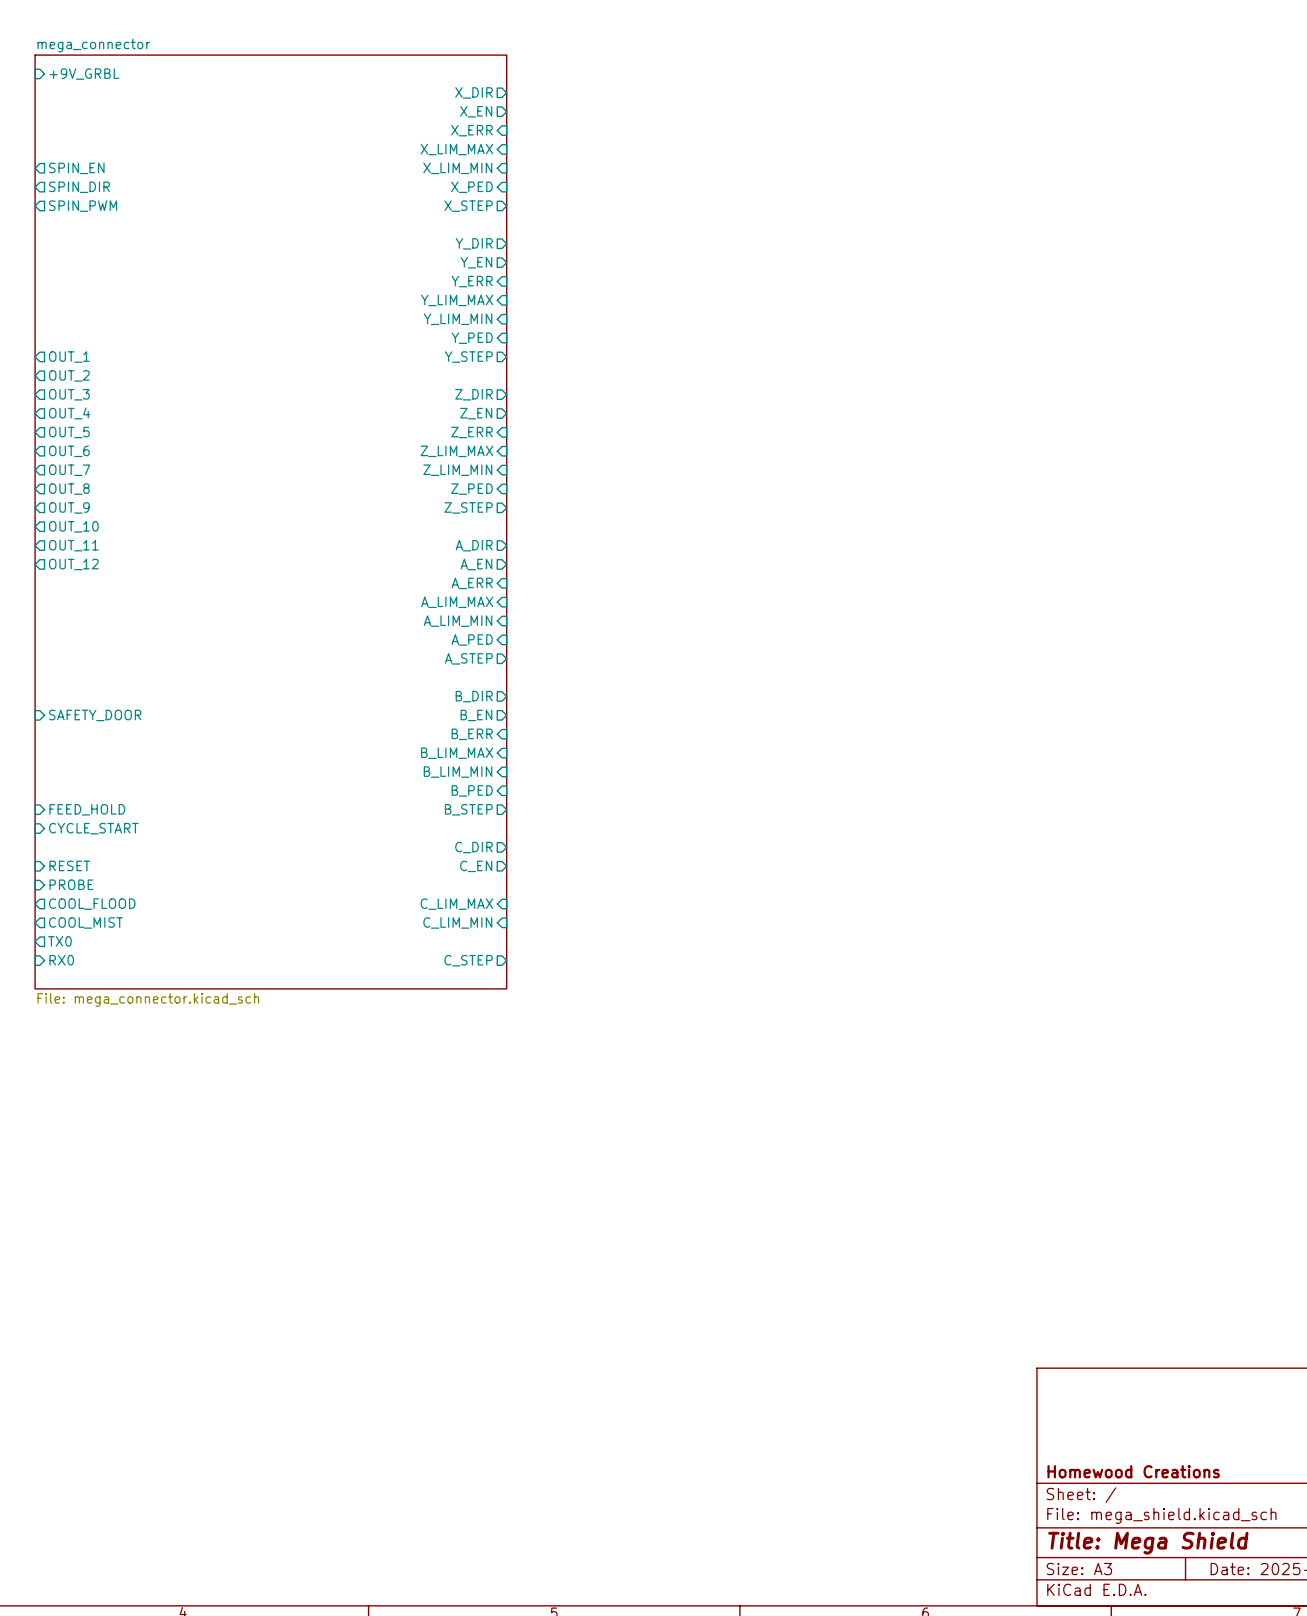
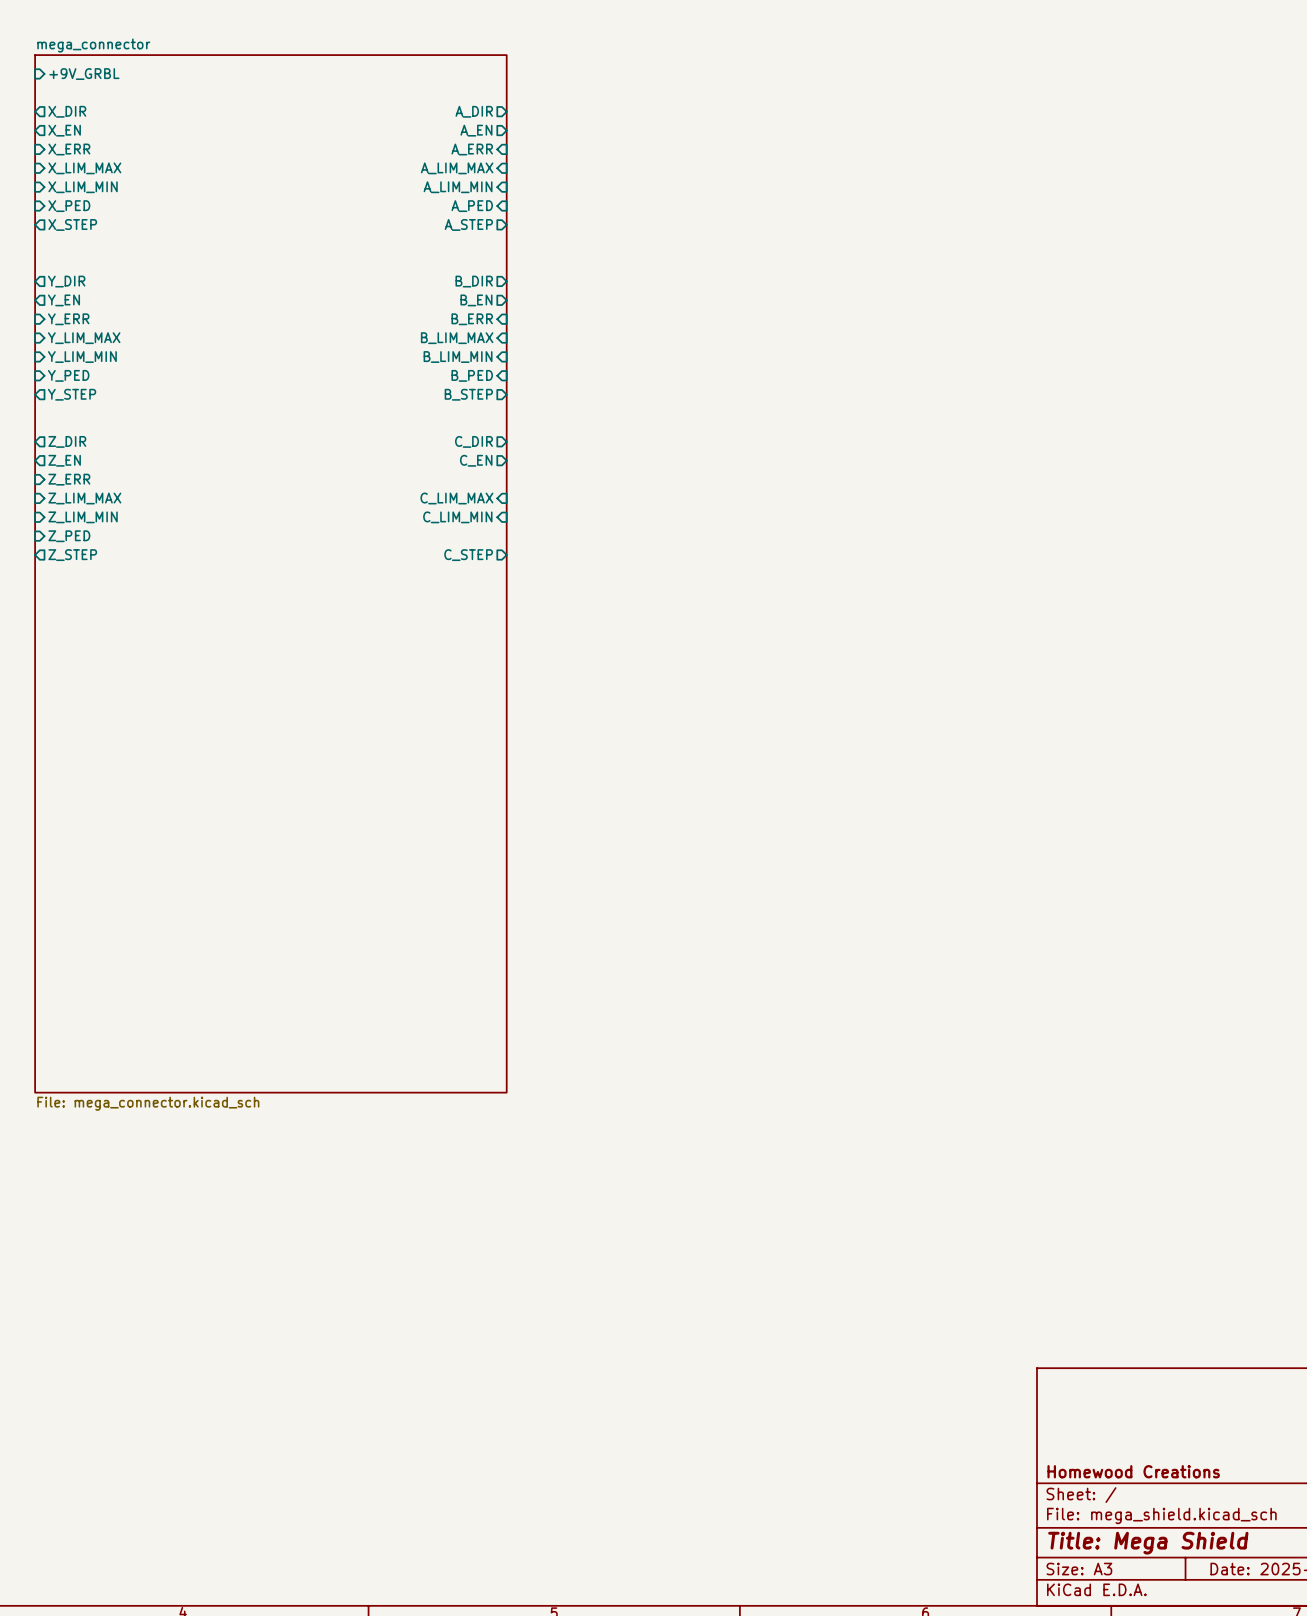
sheet pin: X_DIR (473, 92) -> none
sheet pin: none -> X_DIR (67, 111)
sheet pin: X_EN (476, 111) -> A_DIR (474, 111)
sheet pin: none -> X_EN (64, 130)
sheet pin shape: input (471, 130) -> output (476, 130)
sheet pin: X_ERR (471, 130) -> A_EN (476, 130)
sheet pin: none -> X_ERR (69, 149)
sheet pin: X_LIM_MAX (456, 149) -> A_ERR (472, 149)
sheet pin shape: output (76, 168) -> input (84, 168)
sheet pin: SPIN_EN (76, 168) -> X_LIM_MAX (84, 168)
sheet pin: X_LIM_MIN (457, 168) -> A_LIM_MAX (457, 168)
sheet pin shape: output (79, 187) -> input (83, 187)
sheet pin: SPIN_DIR (79, 187) -> X_LIM_MIN (83, 187)
sheet pin: X_PED (471, 187) -> A_LIM_MIN (458, 187)
sheet pin shape: output (83, 206) -> input (69, 206)
sheet pin: SPIN_PWM (83, 206) -> X_PED (69, 206)
sheet pin shape: output (468, 206) -> input (472, 206)
sheet pin: X_STEP (468, 206) -> A_PED (472, 206)
sheet pin: none -> X_STEP (72, 224)
sheet pin: none -> A_STEP (468, 224)
sheet pin: Y_DIR (474, 243) -> none
sheet pin: Y_EN (476, 262) -> none
sheet pin: none -> Y_DIR (66, 281)
sheet pin shape: input (472, 281) -> output (474, 281)
sheet pin: Y_ERR (472, 281) -> B_DIR (474, 281)
sheet pin: none -> Y_EN (63, 300)
sheet pin shape: input (457, 300) -> output (476, 300)
sheet pin: Y_LIM_MAX (457, 300) -> B_EN (476, 300)
sheet pin: none -> Y_ERR (68, 319)
sheet pin: Y_LIM_MIN (458, 319) -> B_ERR (472, 319)
sheet pin: none -> Y_LIM_MAX (84, 338)
sheet pin: Y_PED (472, 338) -> B_LIM_MAX (457, 338)
sheet pin shape: output (69, 357) -> input (82, 357)
sheet pin: OUT_1 (69, 357) -> Y_LIM_MIN (82, 357)
sheet pin shape: output (468, 357) -> input (458, 357)
sheet pin: Y_STEP (468, 357) -> B_LIM_MIN (458, 357)
sheet pin shape: output (69, 375) -> input (68, 375)
sheet pin: OUT_2 (69, 375) -> Y_PED (68, 375)
sheet pin: none -> B_PED (472, 375)
sheet pin: OUT_3 (69, 394) -> Y_STEP (72, 394)
sheet pin: Z_DIR (473, 394) -> B_STEP (468, 394)
sheet pin: OUT_4 (69, 413) -> none
sheet pin: Z_EN (476, 413) -> none
sheet pin: OUT_5 (69, 432) -> none
sheet pin: Z_ERR (471, 432) -> none
sheet pin: none -> Z_DIR (67, 441)
sheet pin: none -> C_DIR (473, 441)
sheet pin: OUT_6 (69, 451) -> none
sheet pin: Z_LIM_MAX (456, 451) -> none
sheet pin: none -> Z_EN (64, 460)
sheet pin: none -> C_EN (476, 460)
sheet pin: OUT_7 (69, 470) -> none
sheet pin: Z_LIM_MIN (457, 470) -> none
sheet pin: none -> Z_ERR (69, 479)
sheet pin: OUT_8 (69, 489) -> none
sheet pin: Z_PED (471, 489) -> none
sheet pin: none -> Z_LIM_MAX (84, 498)
sheet pin: none -> C_LIM_MAX (456, 498)
sheet pin: OUT_9 (69, 507) -> none
sheet pin: Z_STEP (468, 507) -> none
sheet pin: none -> Z_LIM_MIN (83, 517)
sheet pin: none -> C_LIM_MIN (457, 517)
sheet mega_connector: File: mega_connector.kicad_sch (270, 521) -> none
sheet pin: OUT_10 (73, 526) -> none
sheet pin: none -> Z_PED (69, 536)
sheet pin: OUT_11 (73, 545) -> none
sheet pin: A_DIR (474, 545) -> none
sheet pin: none -> Z_STEP (72, 555)
sheet pin: none -> C_STEP (468, 555)
sheet pin: OUT_12 (73, 564) -> none
sheet pin: A_EN (476, 564) -> none
sheet mega_connector: none -> File: mega_connector.kicad_sch (270, 573)
sheet pin: A_ERR (472, 583) -> none
sheet pin: A_LIM_MAX (457, 602) -> none
sheet pin: A_LIM_MIN (458, 621) -> none
sheet pin: A_PED (472, 639) -> none
sheet pin: A_STEP (468, 658) -> none
sheet pin: B_DIR (474, 696) -> none
sheet pin: SAFETY_DOOR (95, 715) -> none
sheet pin: B_EN (476, 715) -> none
sheet pin: B_ERR (472, 734) -> none
sheet pin: B_LIM_MAX (457, 753) -> none
sheet pin: B_LIM_MIN (458, 772) -> none
sheet pin: B_PED (472, 790) -> none
sheet pin: FEED_HOLD (87, 809) -> none
sheet pin: B_STEP (468, 809) -> none
sheet pin: CYCLE_START (93, 828) -> none
sheet pin: C_DIR (473, 847) -> none
sheet pin: RESET (69, 865) -> none
sheet pin: C_EN (476, 866) -> none
sheet pin: PROBE (71, 884) -> none
sheet pin: COOL_FLOOD (92, 904) -> none
sheet pin: C_LIM_MAX (456, 904) -> none
sheet pin: COOL_MIST (85, 922) -> none
sheet pin: C_LIM_MIN (457, 922) -> none
sheet pin: TX0 (59, 941) -> none
sheet pin: RX0 (61, 960) -> none
sheet pin: C_STEP (468, 960) -> none

